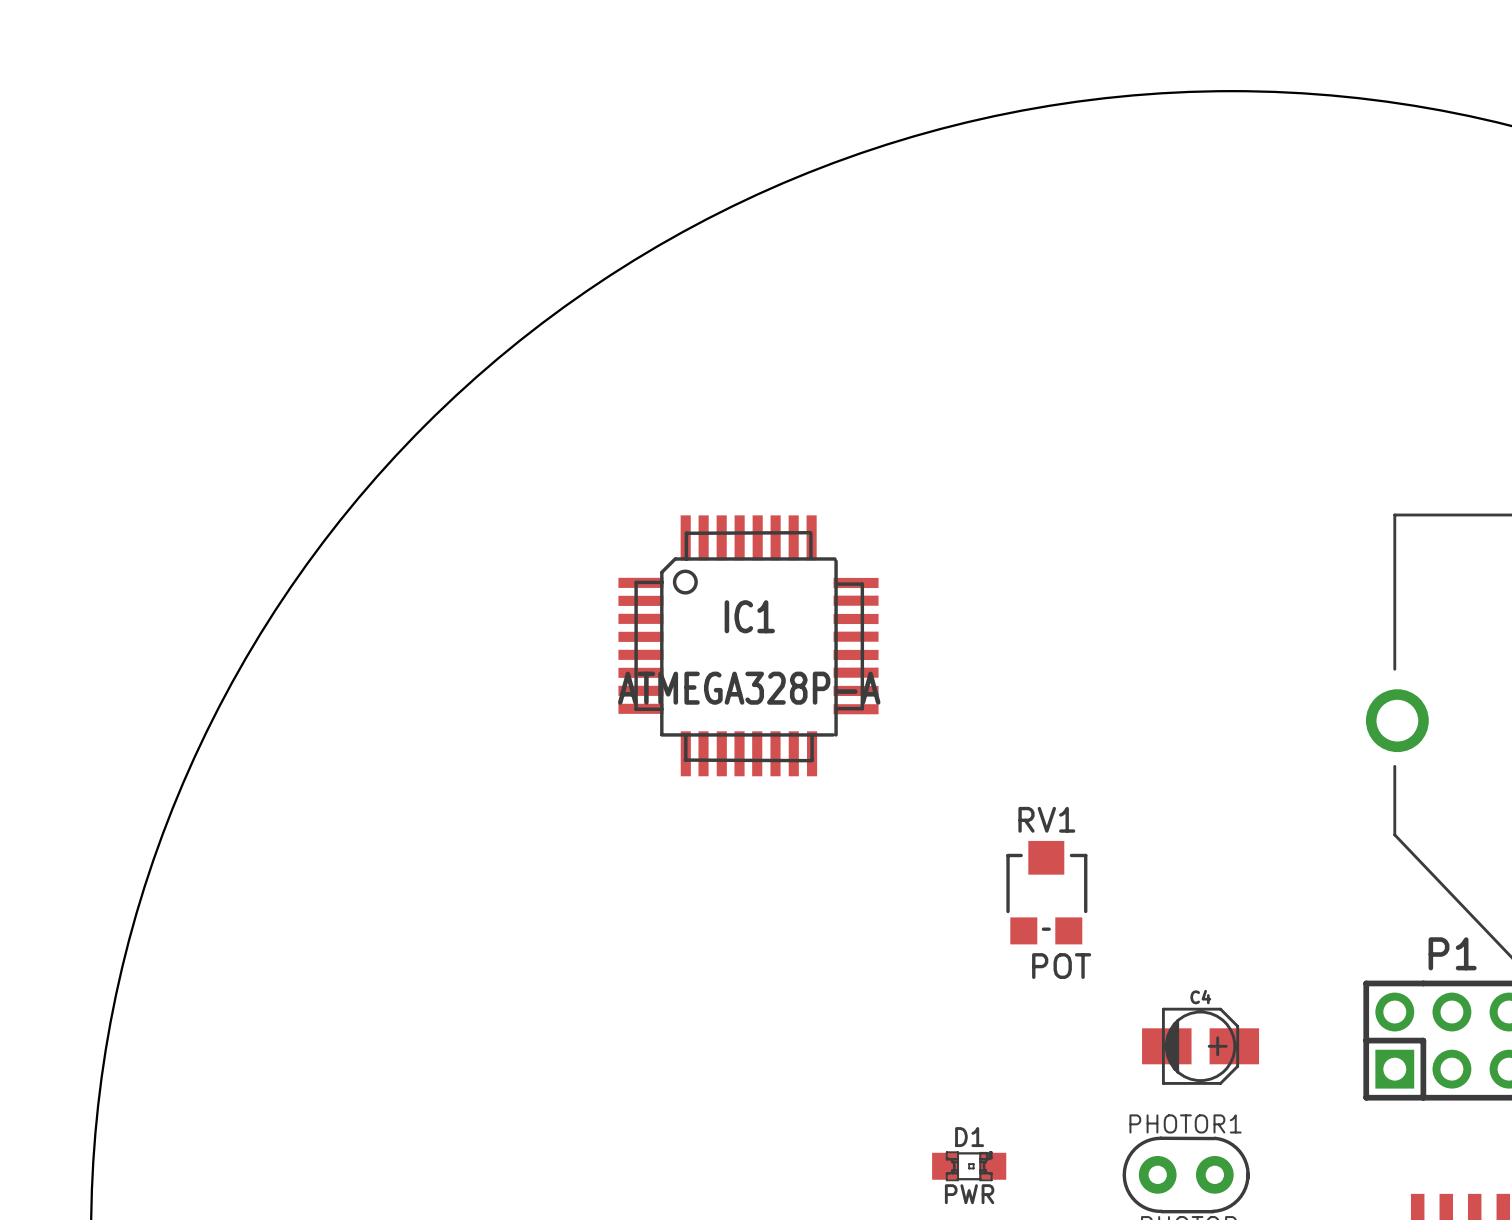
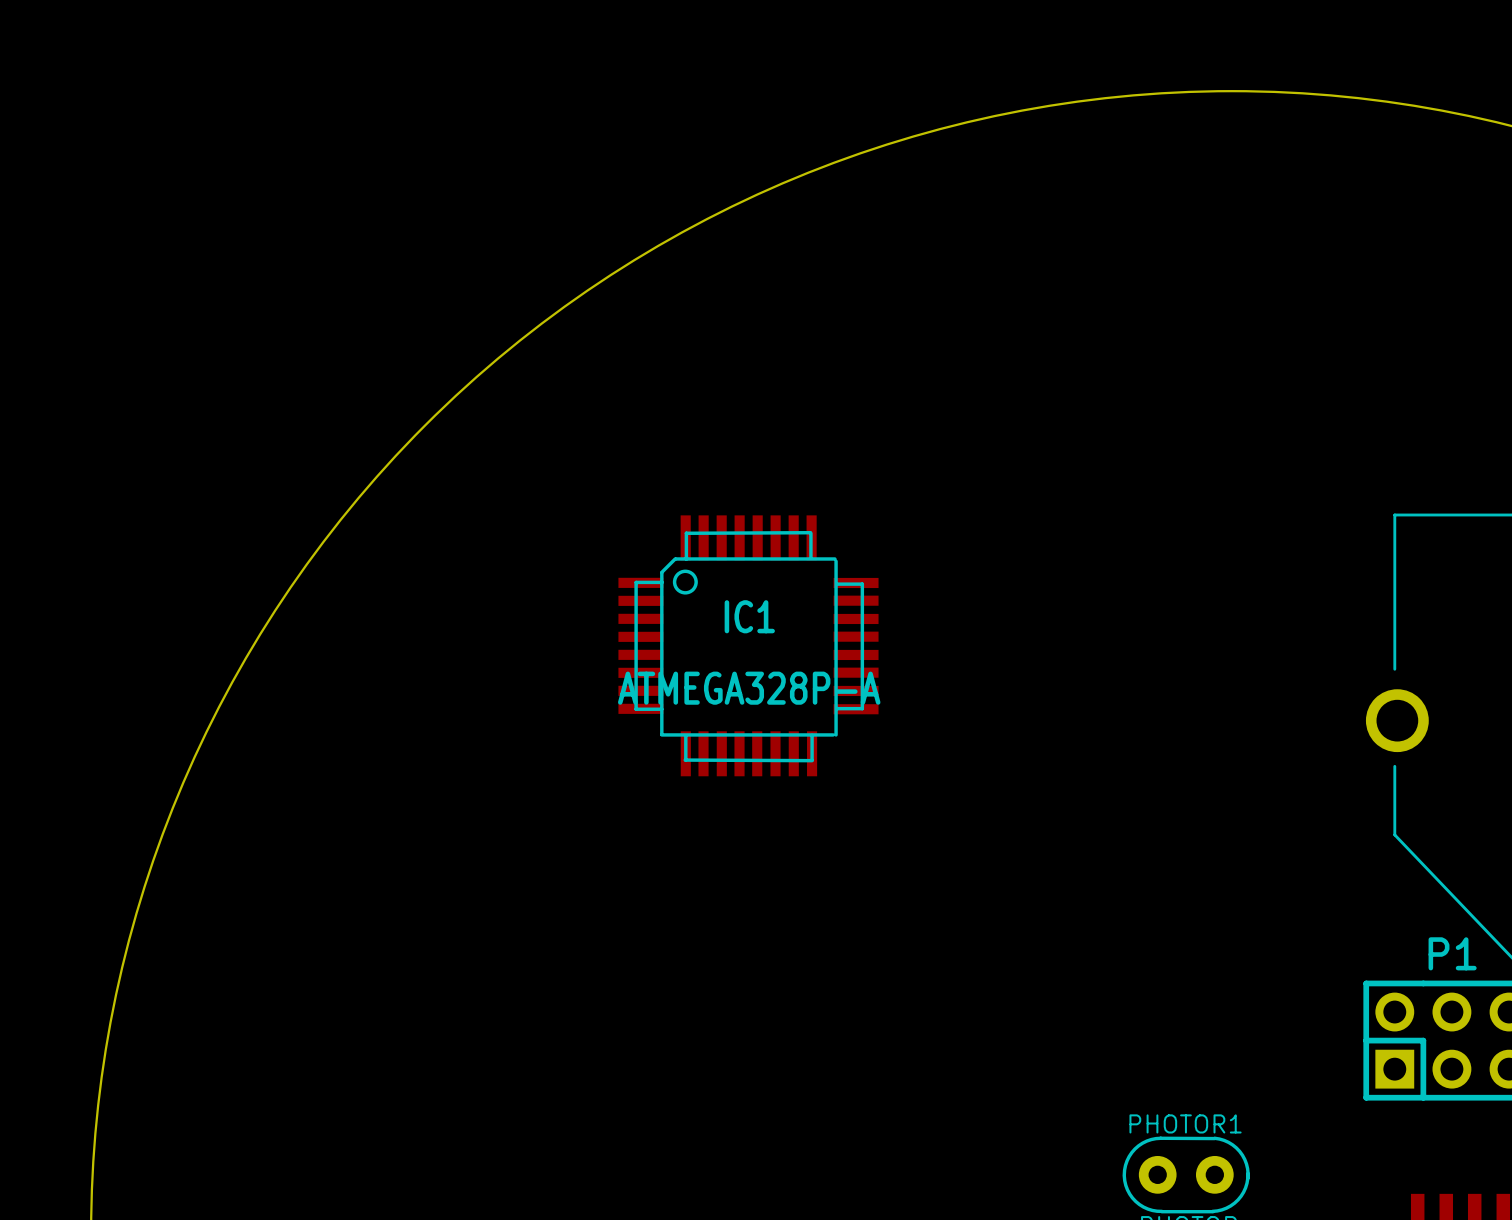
RV1: POT (1046, 892) -> none
C4: (1200, 1046) -> none
D1: PWR (969, 1166) -> none

